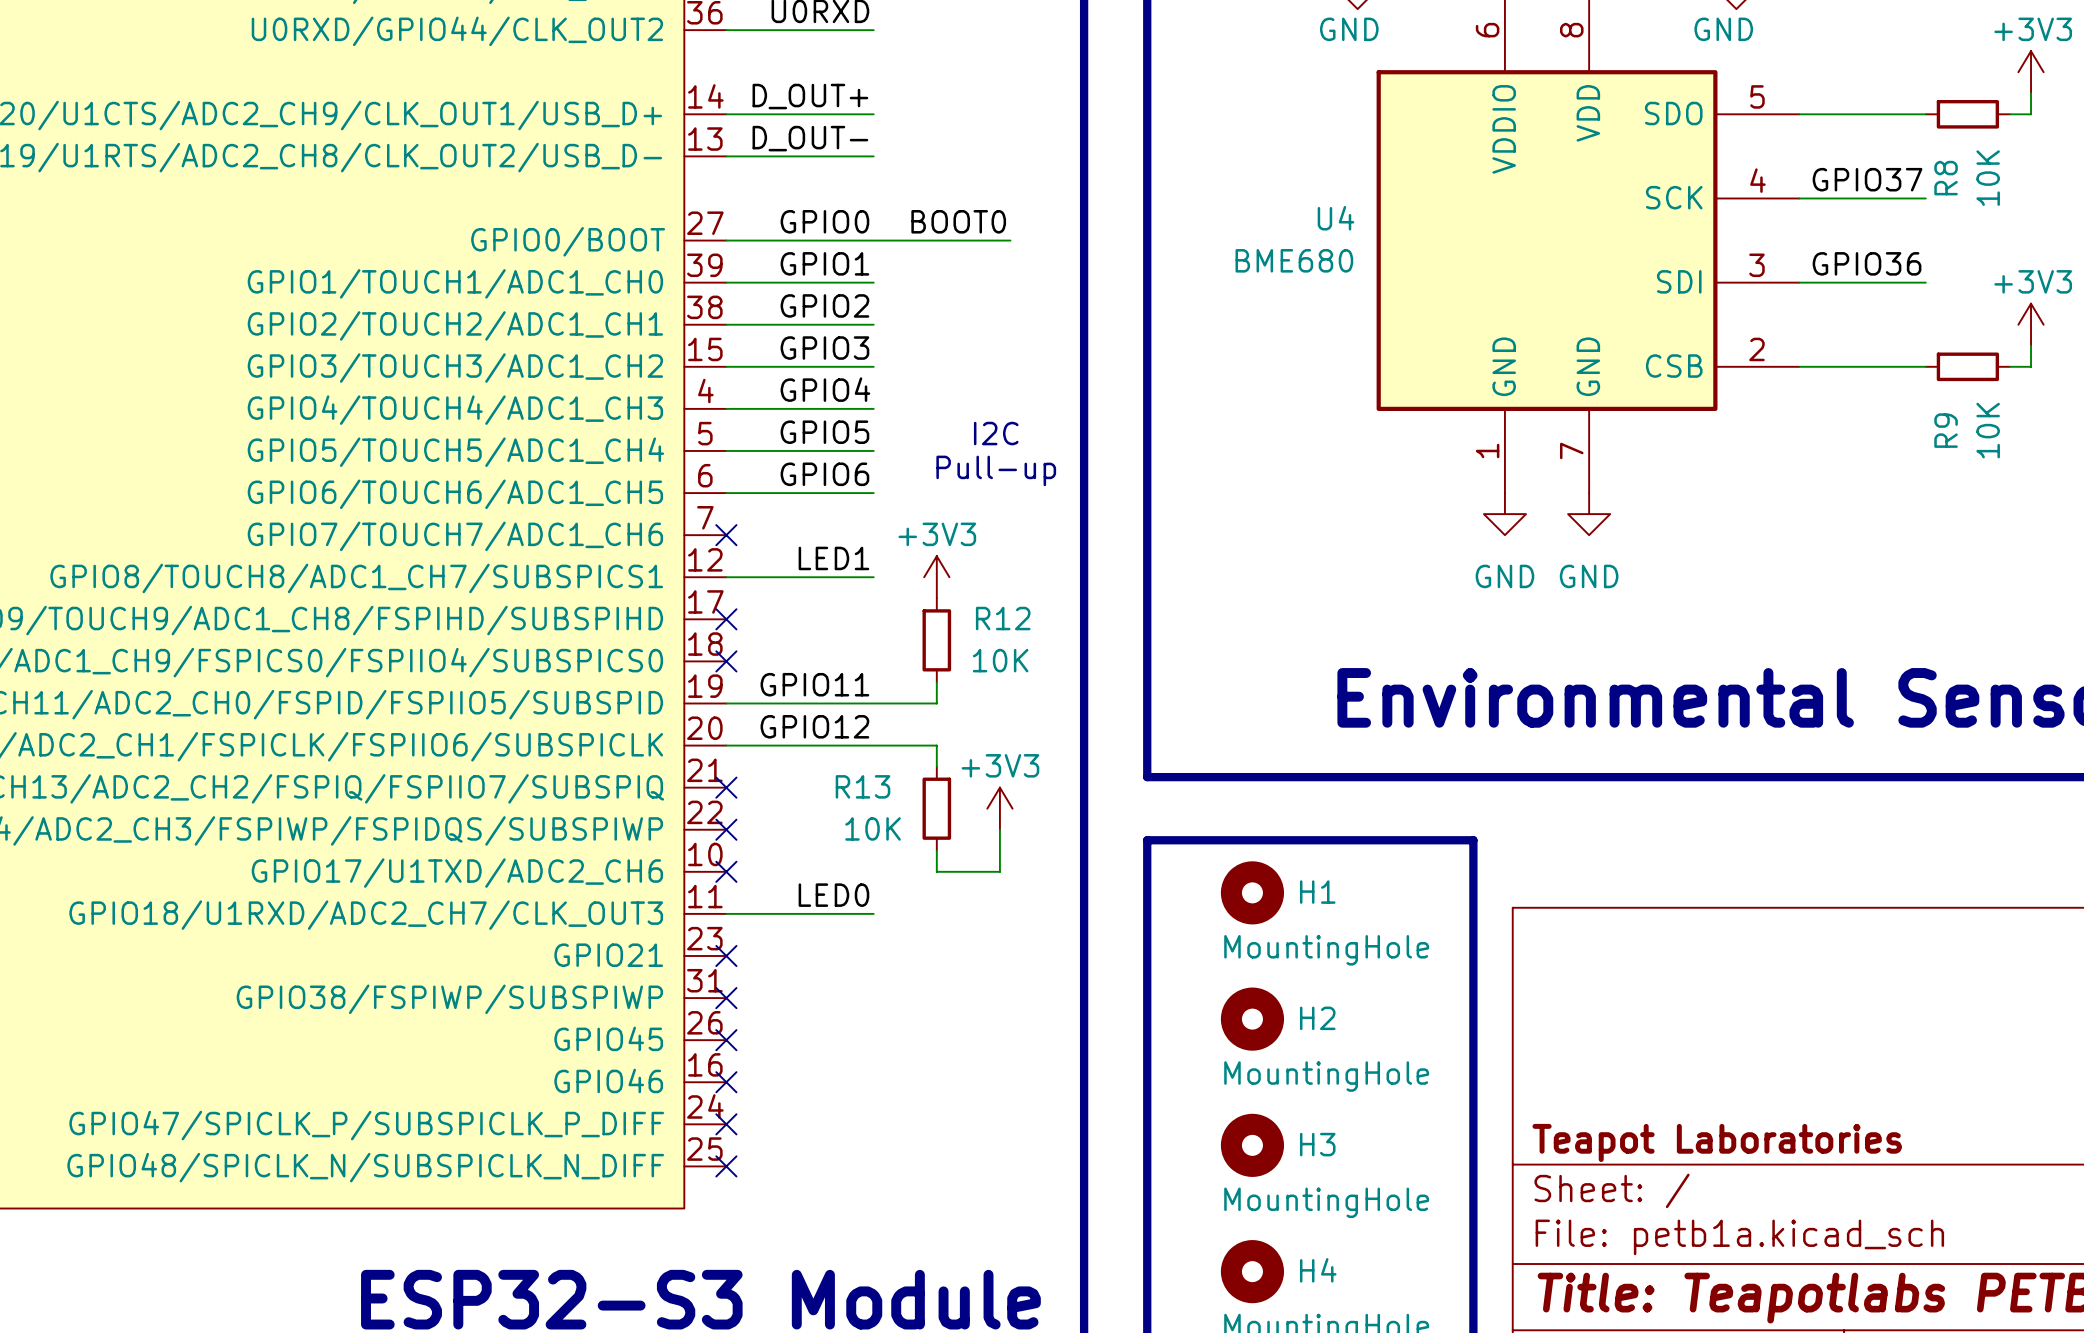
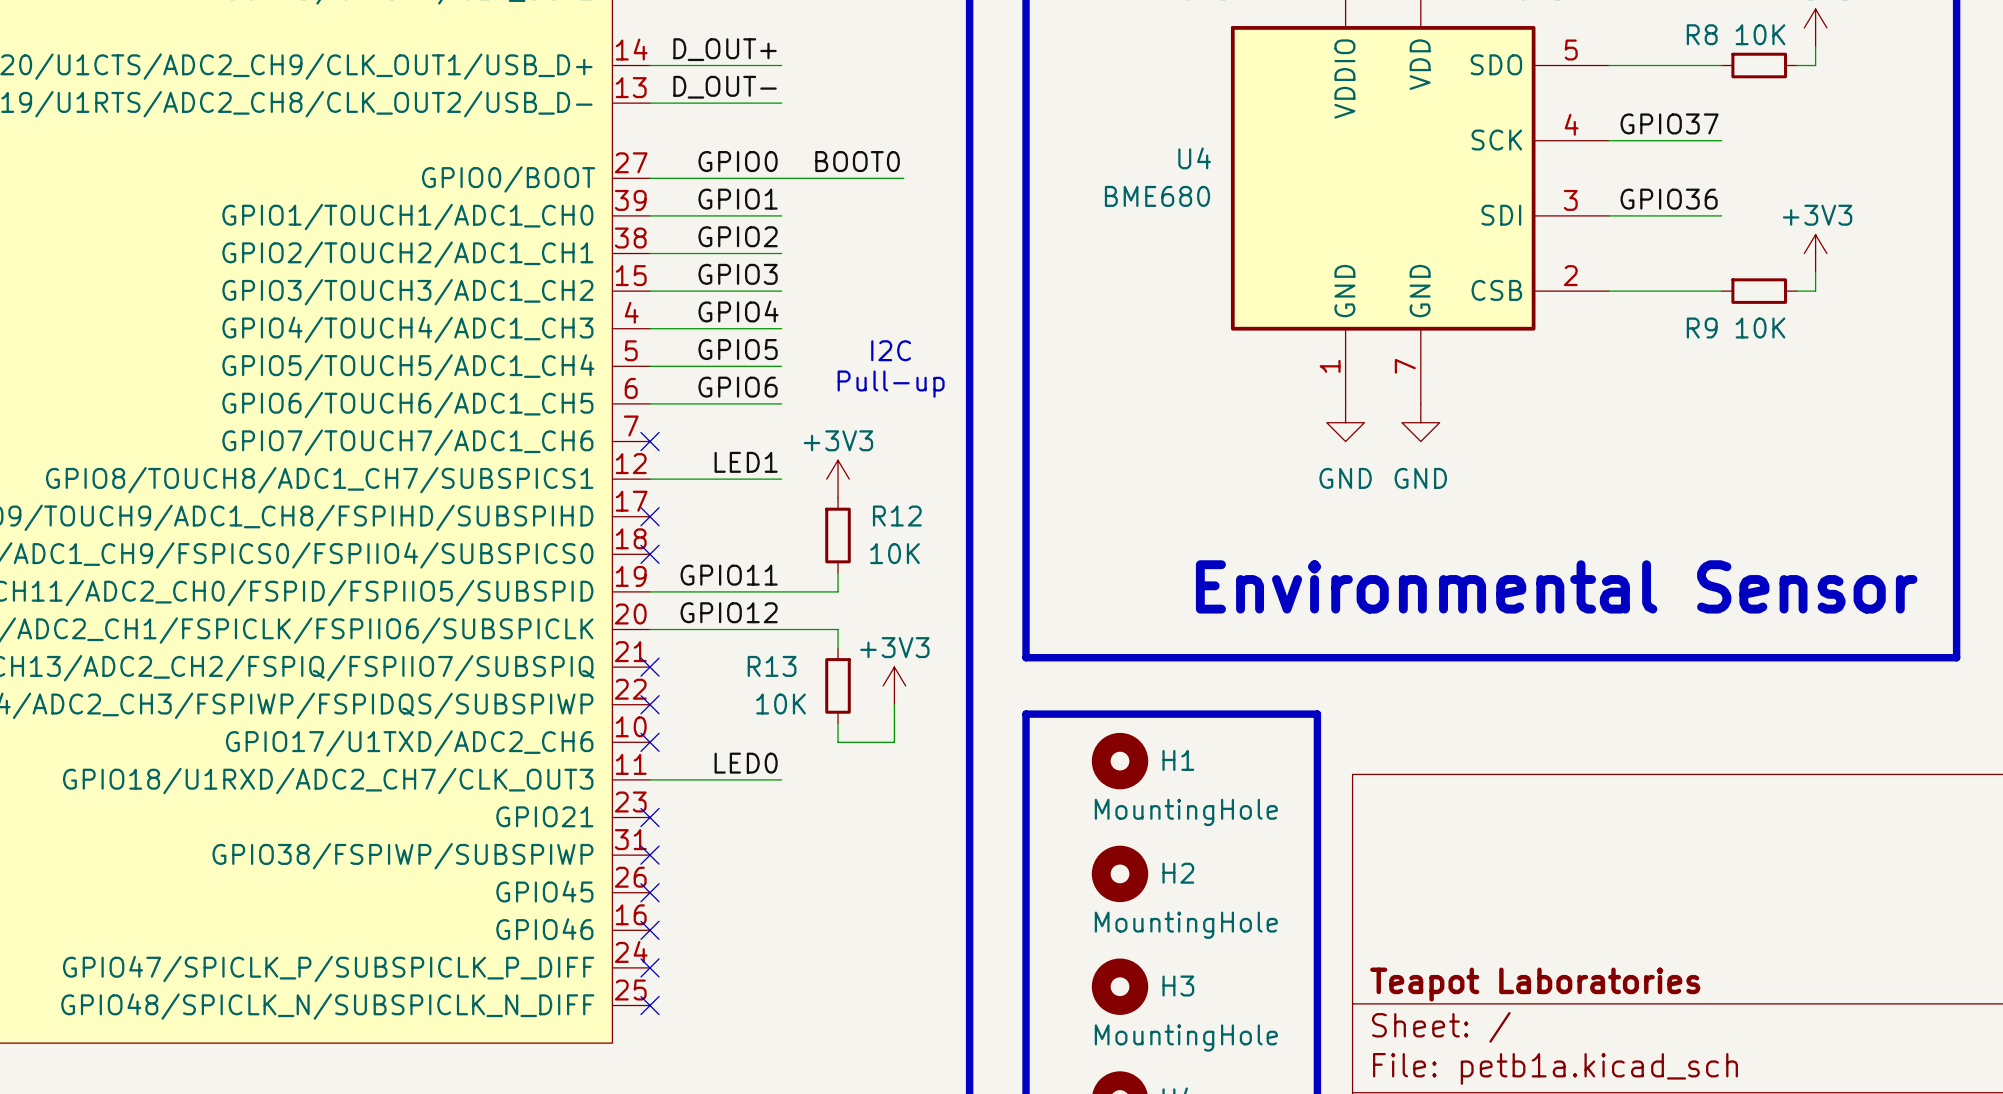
R8 name rotation: 0° (1946, 178) -> 90° clockwise (1702, 34)
R8 name position: R8 (1946, 178) -> R8 (1702, 34)
R8 value rotation: 0° (1988, 178) -> 90° clockwise (1760, 34)
R8 value position: 10K (1988, 178) -> 10K (1760, 34)
R9 name rotation: 0° (1946, 430) -> 90° clockwise (1702, 328)
R9 name position: R9 (1946, 430) -> R9 (1702, 328)
R9 value rotation: 0° (1988, 430) -> 90° clockwise (1760, 328)

